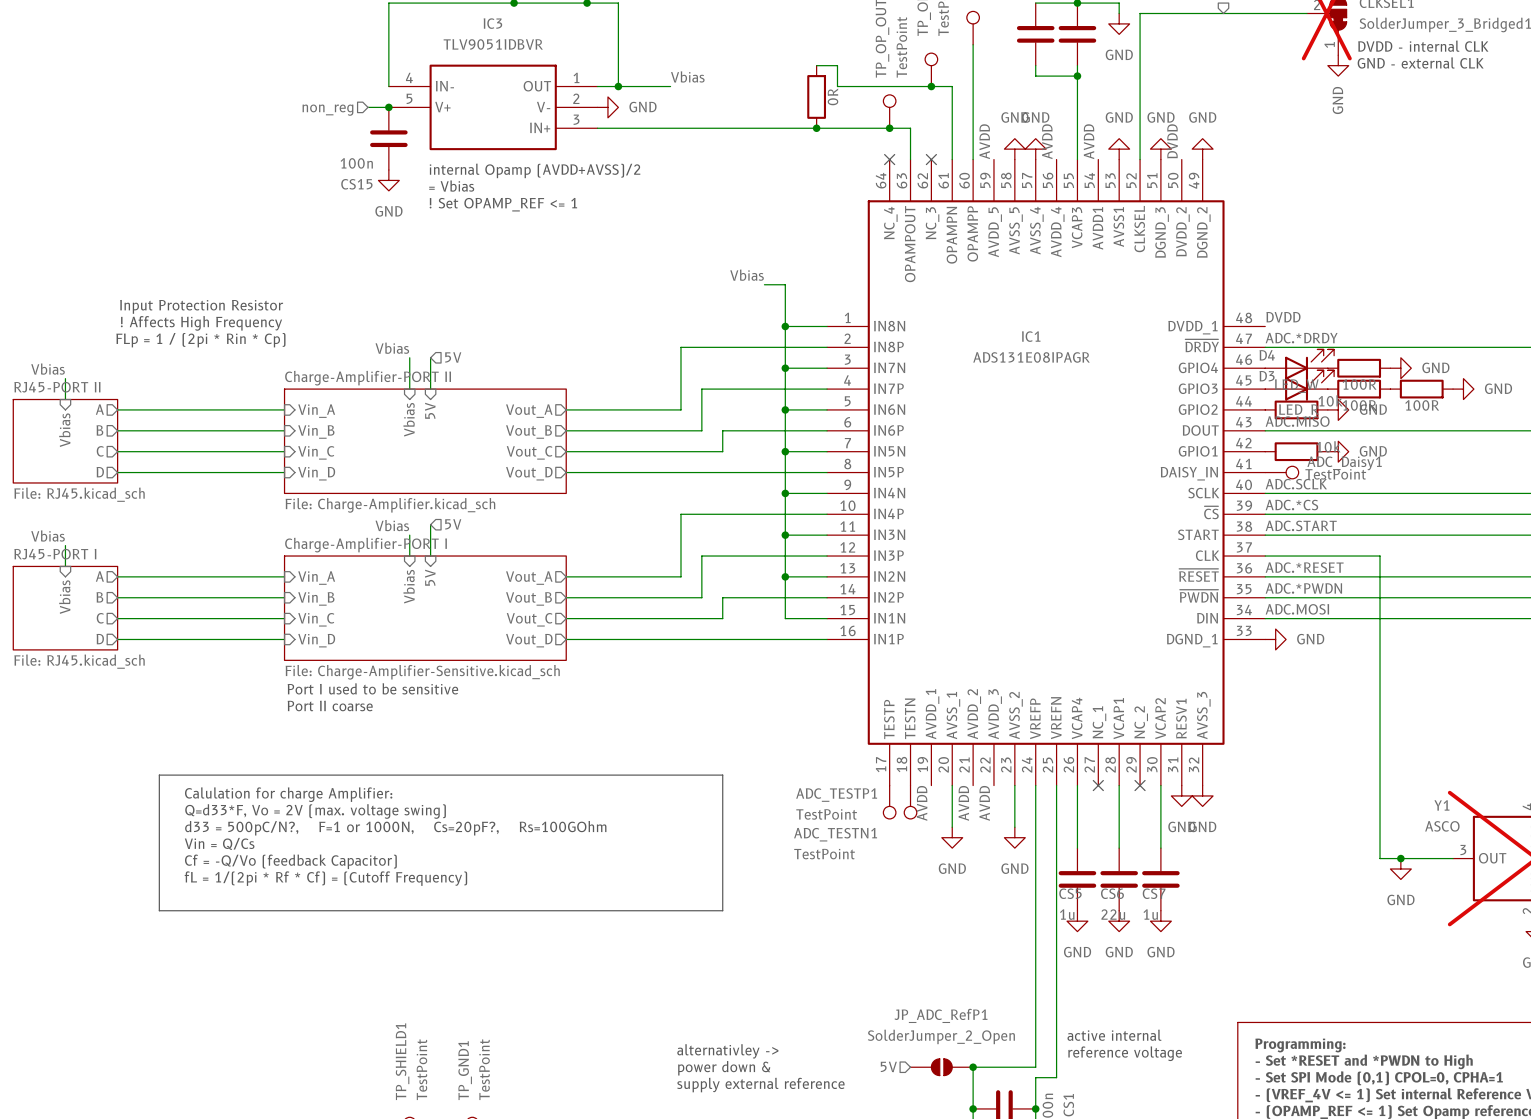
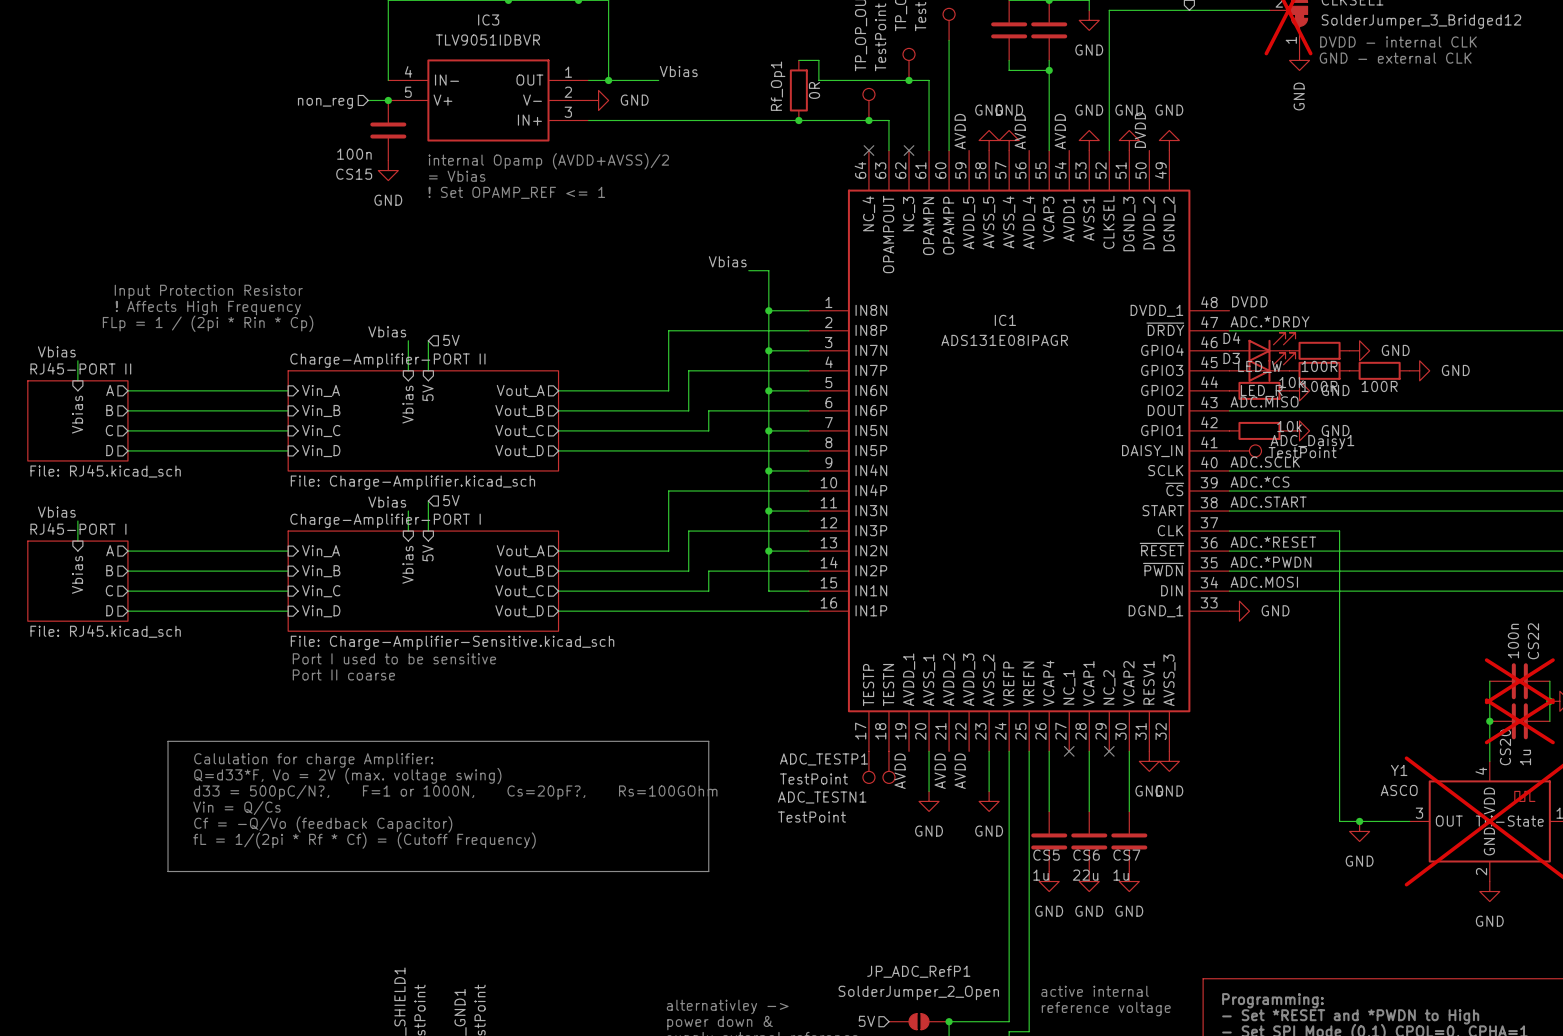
Rf_Op1 name: none -> Rf_Op1 (778, 86)

